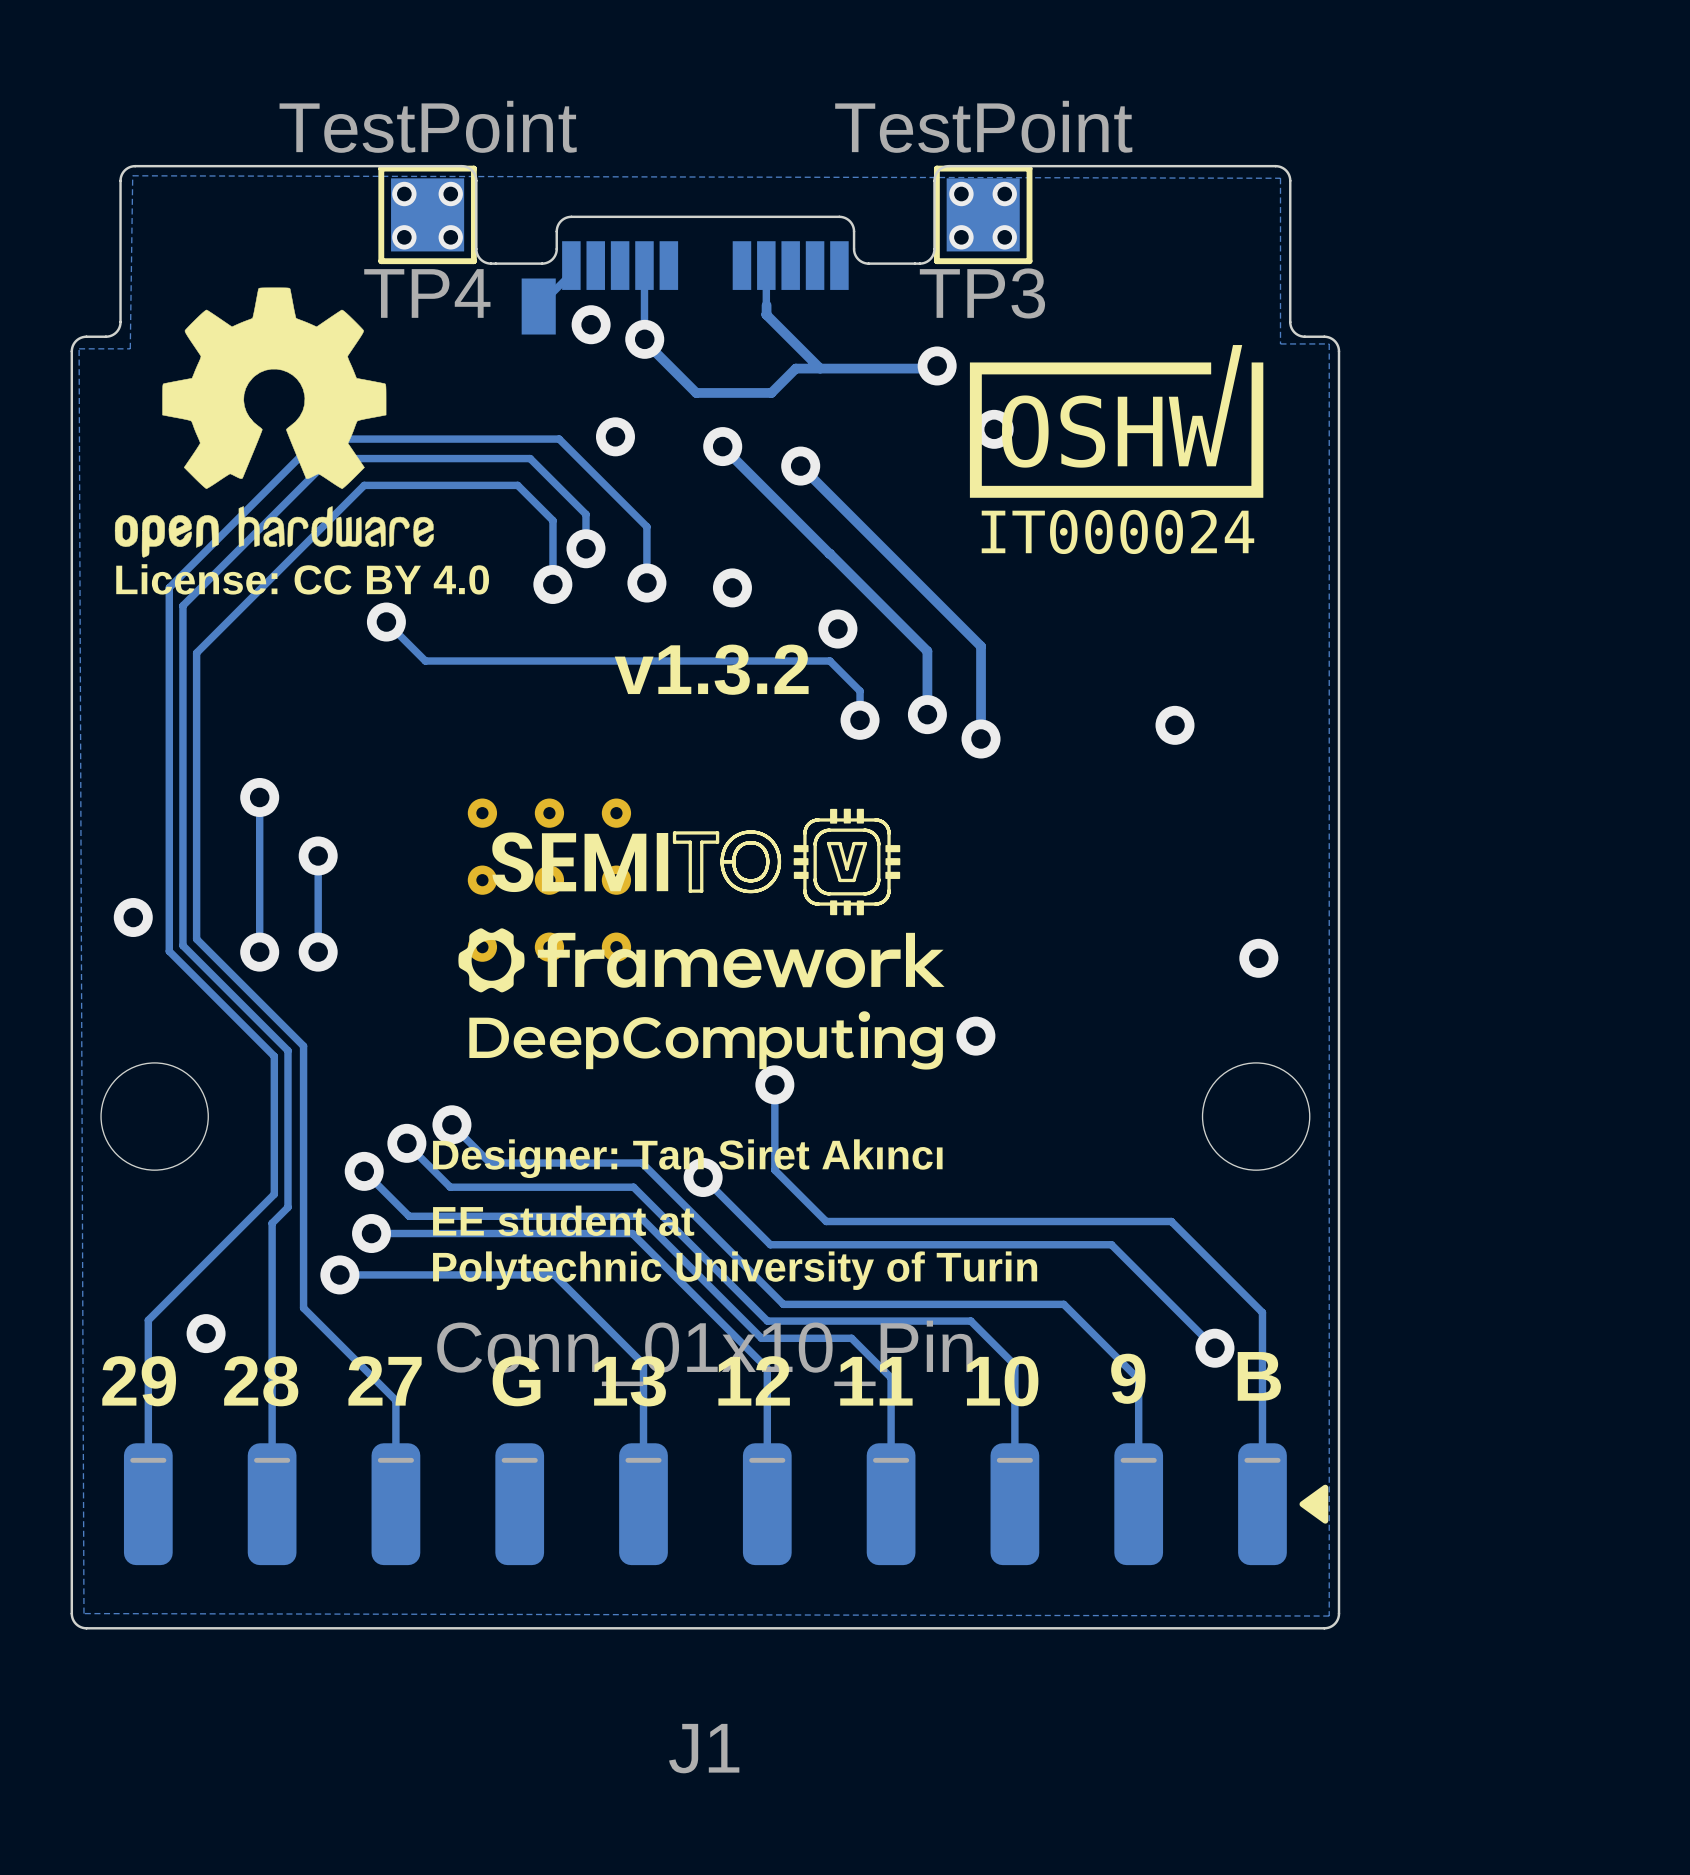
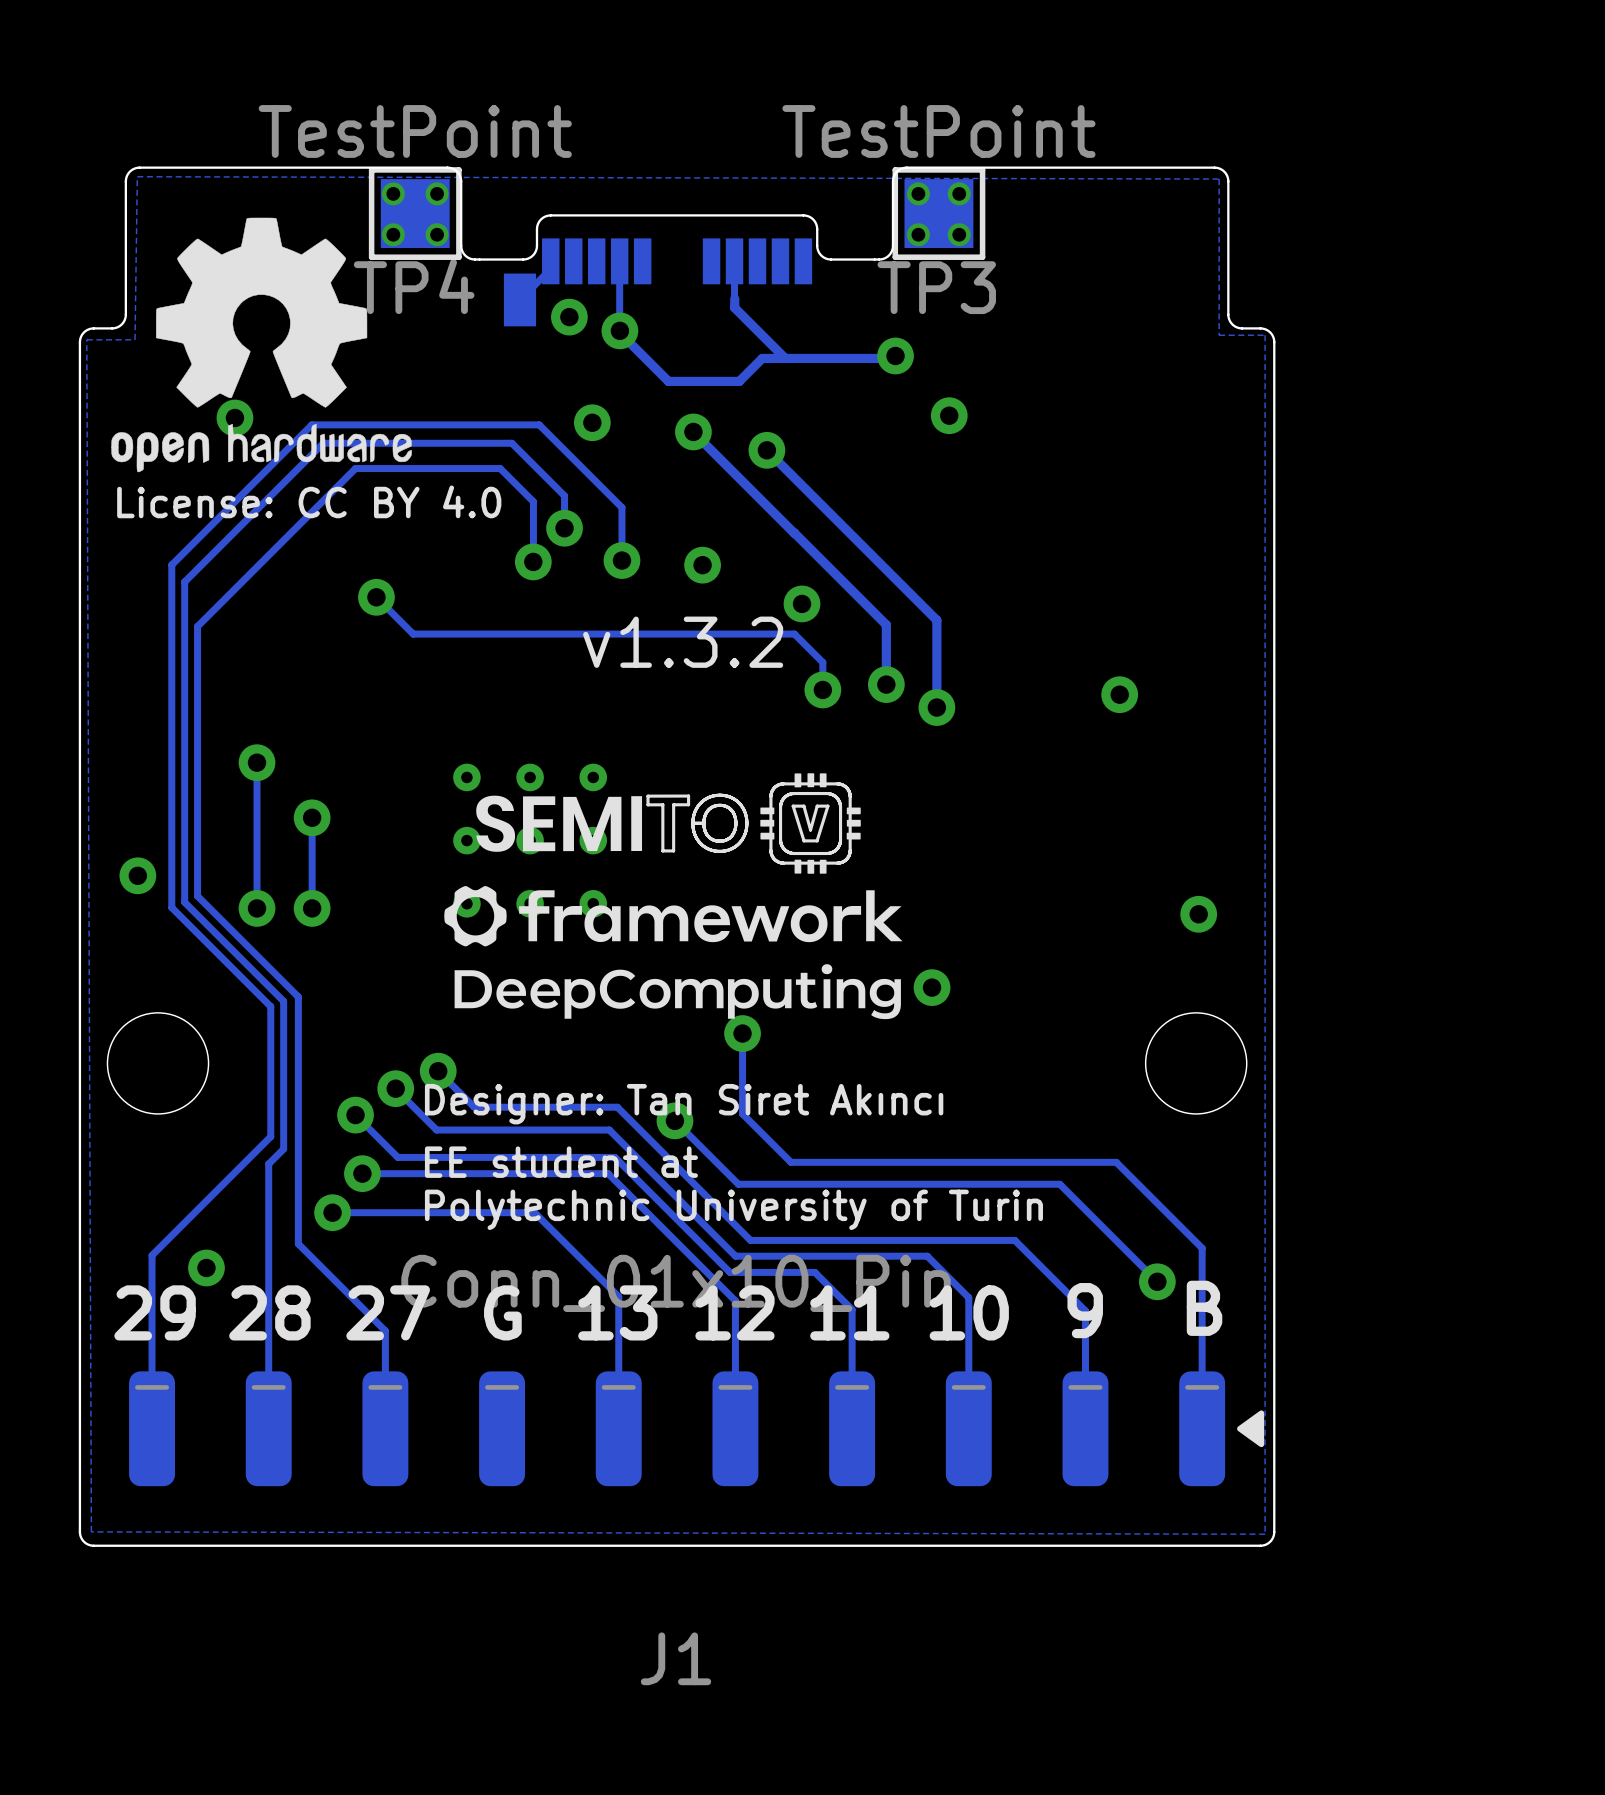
drawing: [969, 345, 1264, 555] -> none
drawing position: (274, 422) -> (261, 344)
text position: License: CC BY 4.0 (302, 579) -> License: CC BY 4.0 (309, 501)

